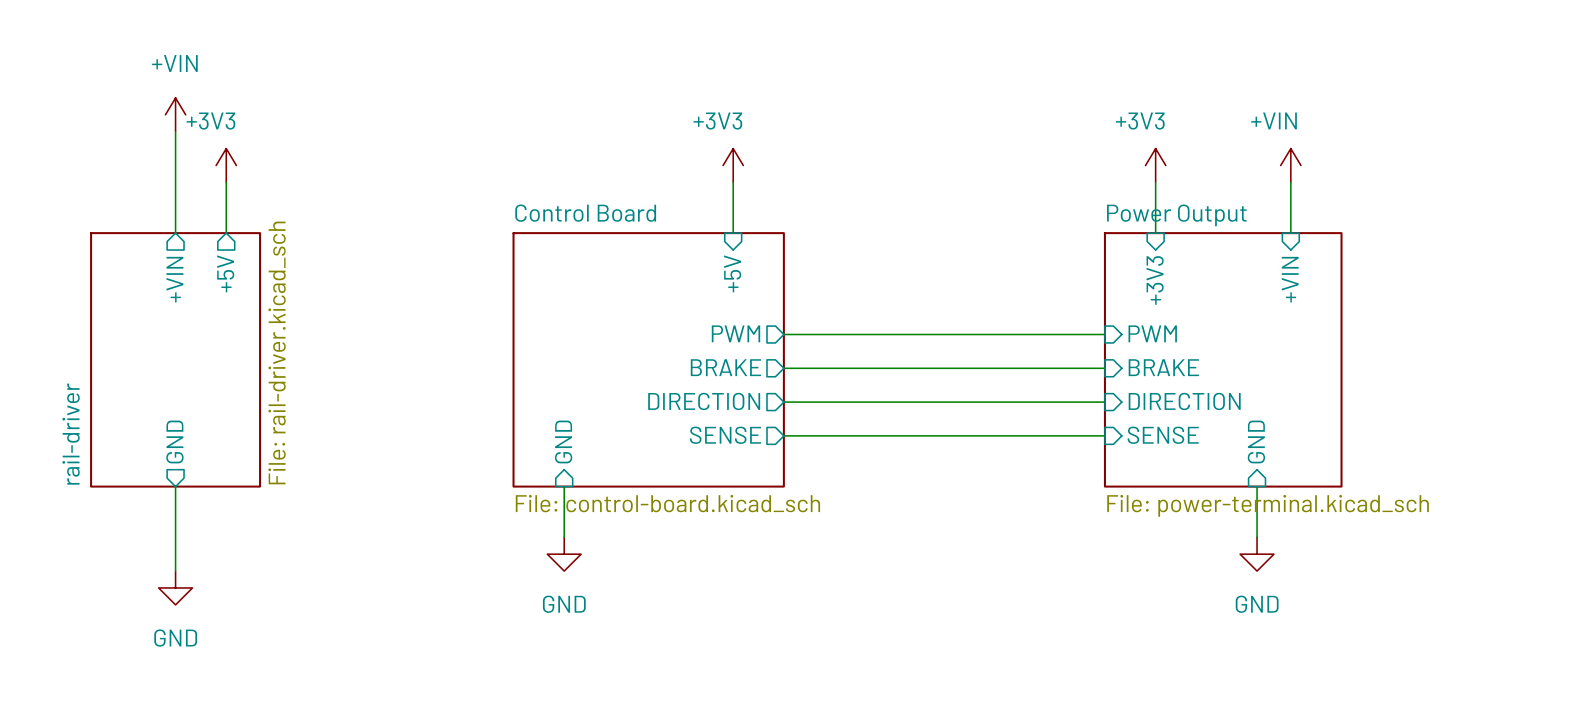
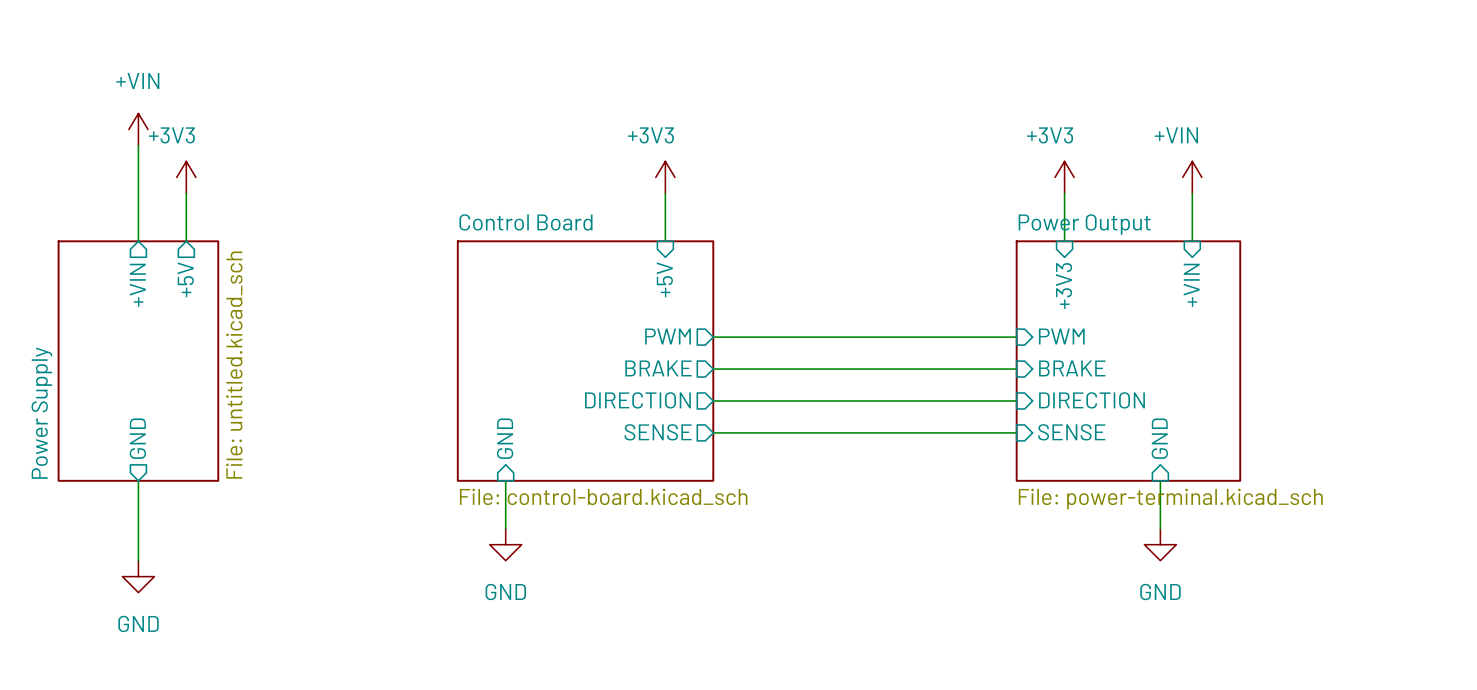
sheet rail-driver value: File: rail-driver.kicad_sch (277, 352) -> File: untitled.kicad_sch (234, 365)
sheet rail-driver name: rail-driver (71, 434) -> Power Supply (41, 413)

